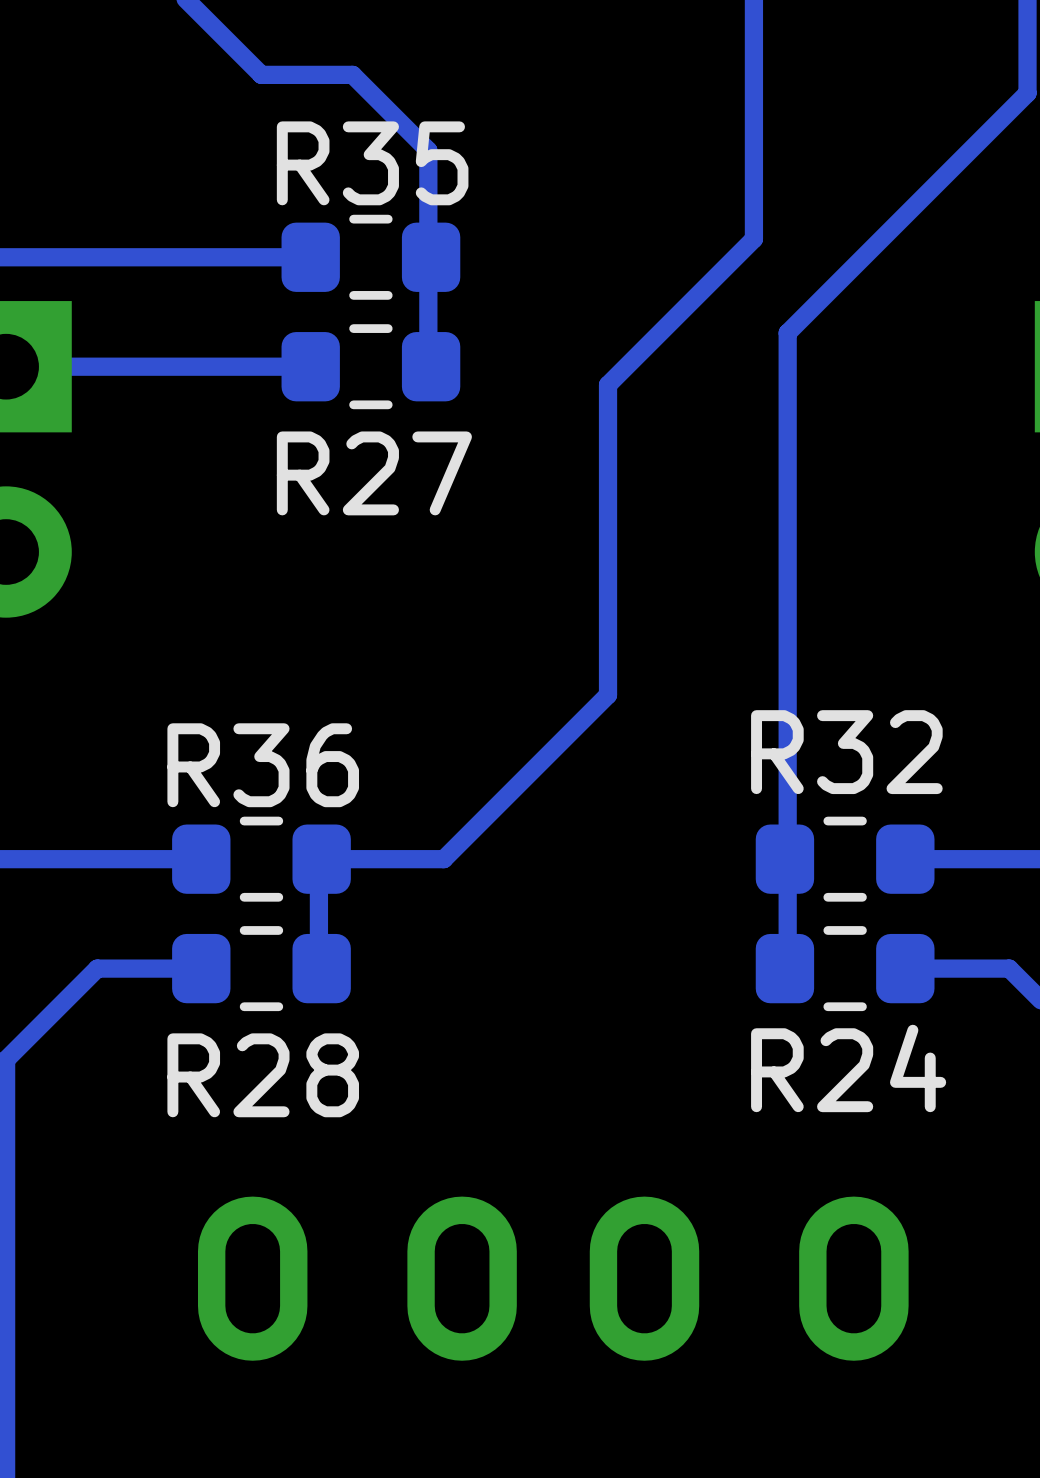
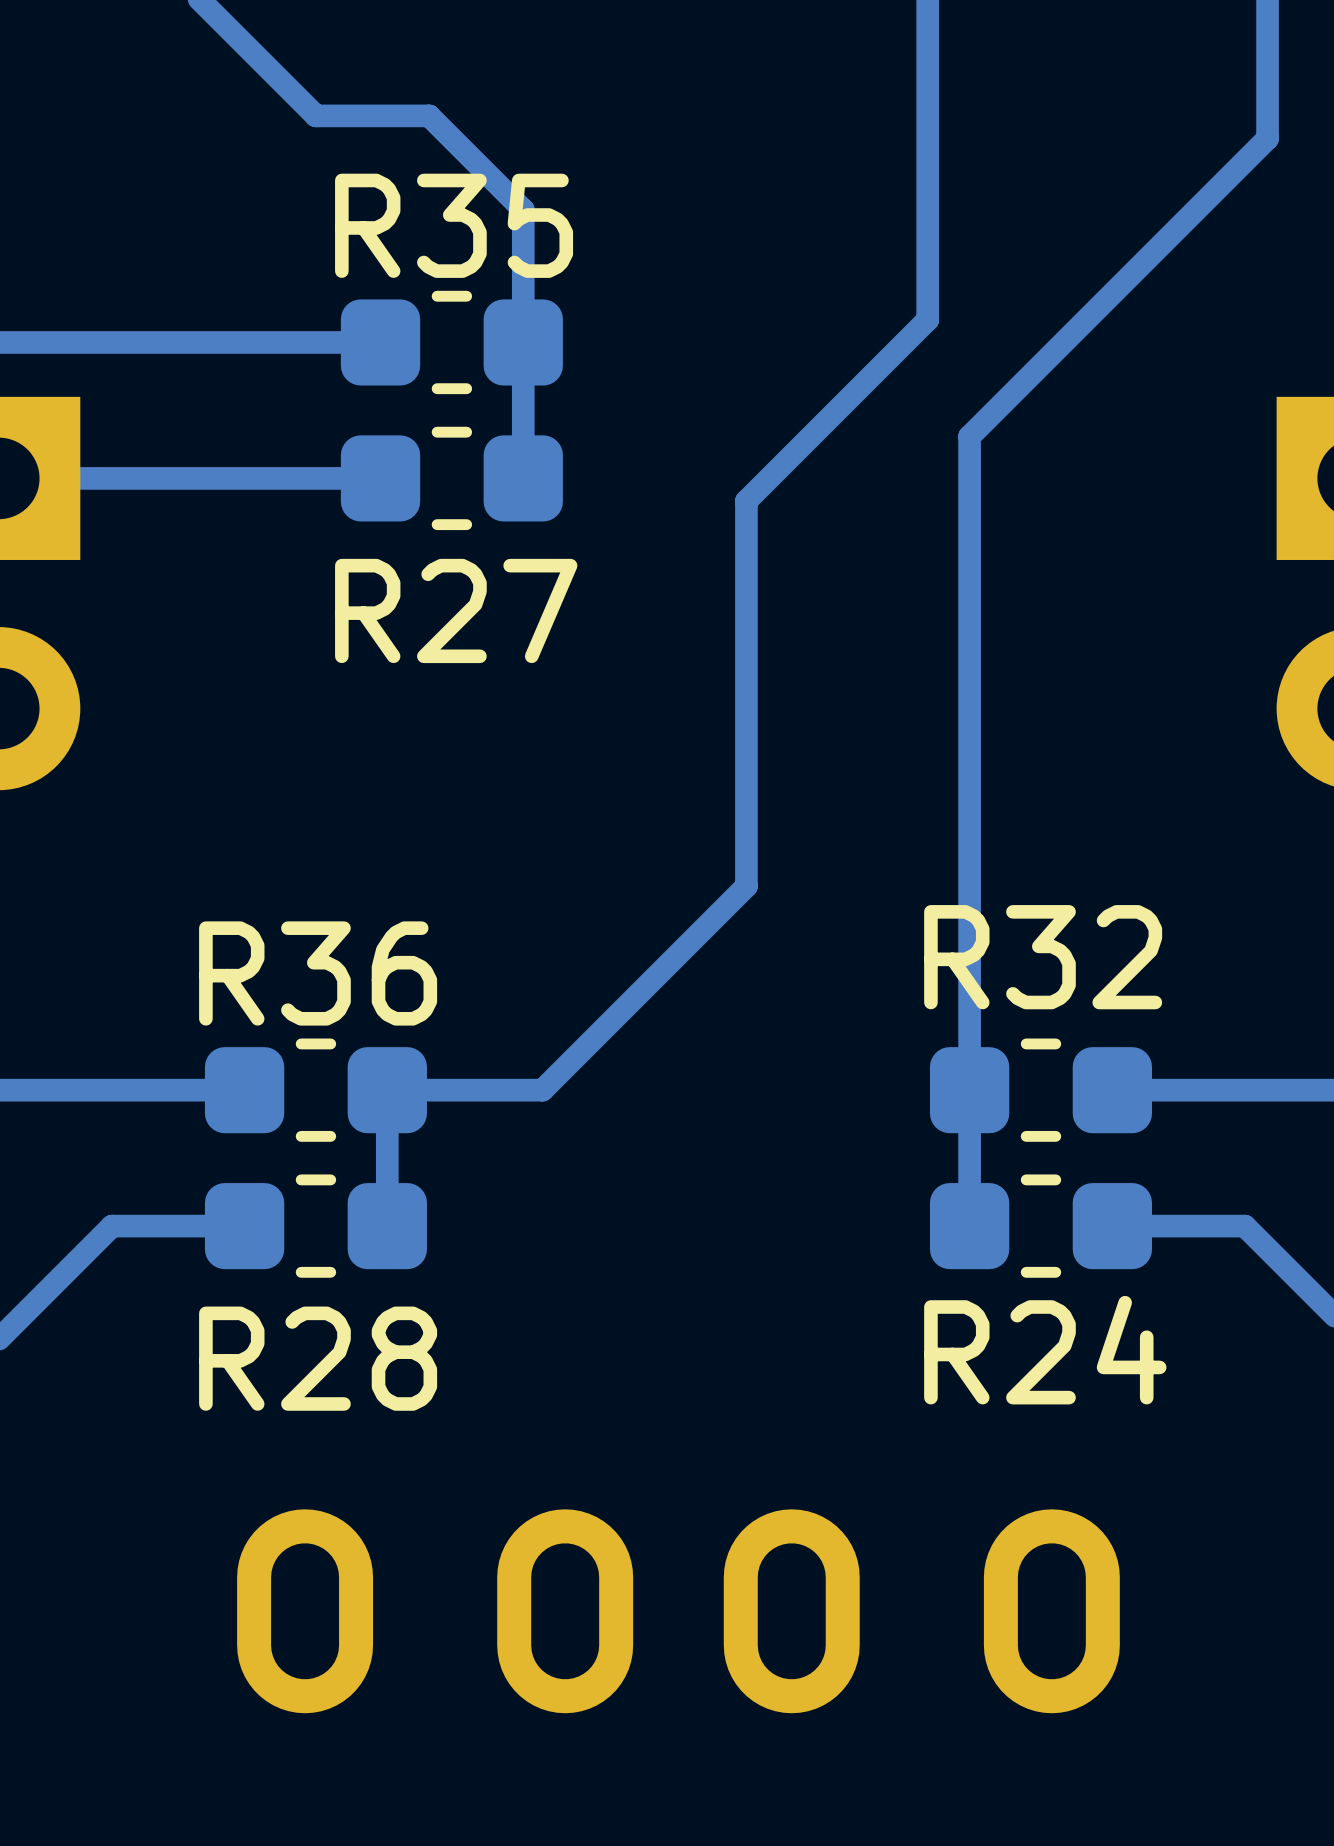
R35 footprint: [281, 214, 461, 300] -> [340, 290, 563, 395]
R27 footprint: [281, 324, 461, 410] -> [340, 426, 563, 531]
R36 footprint: [172, 816, 351, 902] -> [204, 1038, 427, 1142]
R32 footprint: [755, 816, 935, 902] -> [929, 1038, 1153, 1142]
R28 footprint: [172, 926, 351, 1012] -> [204, 1174, 427, 1278]
R24 footprint: [755, 926, 935, 1012] -> [929, 1174, 1153, 1278]

